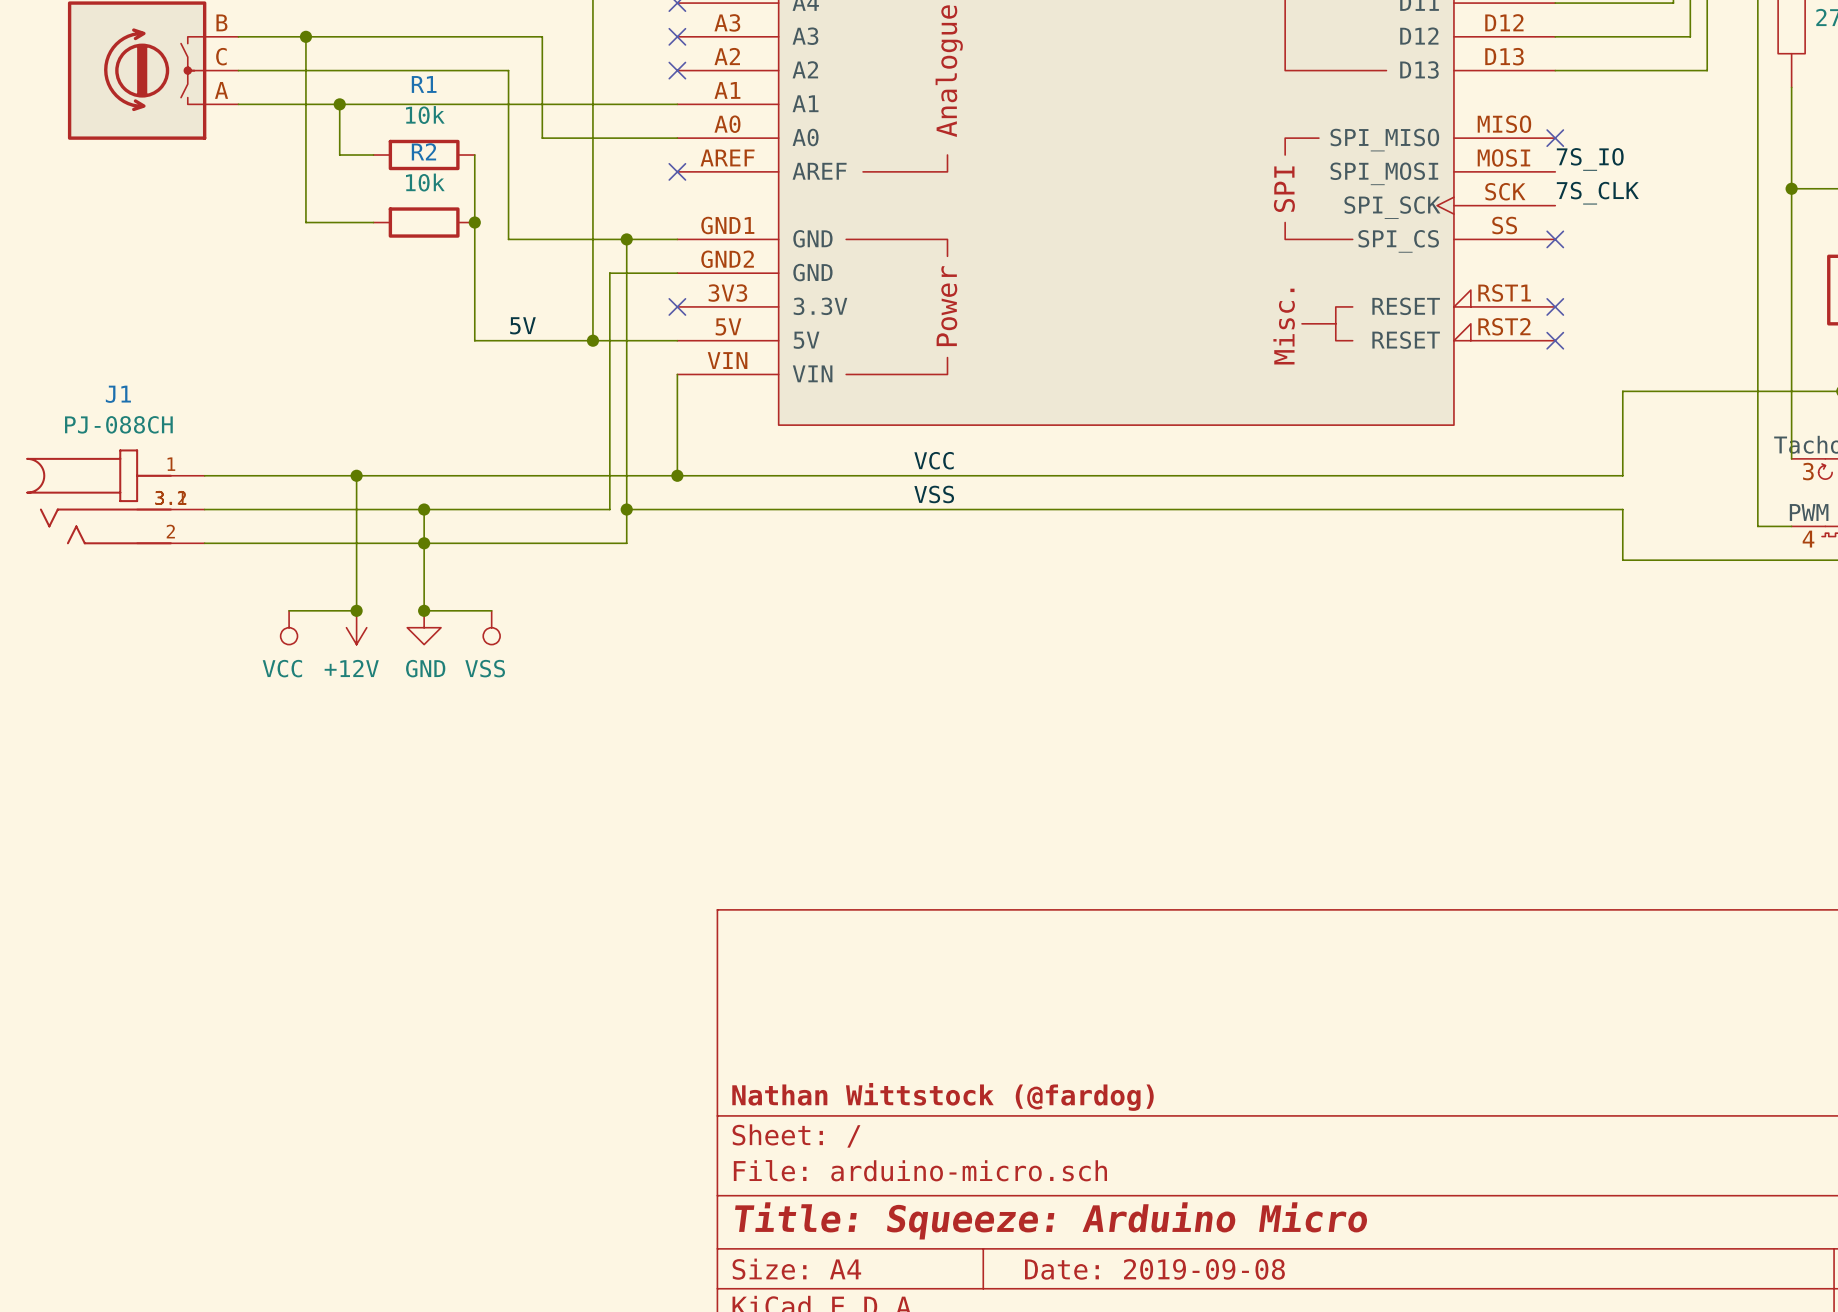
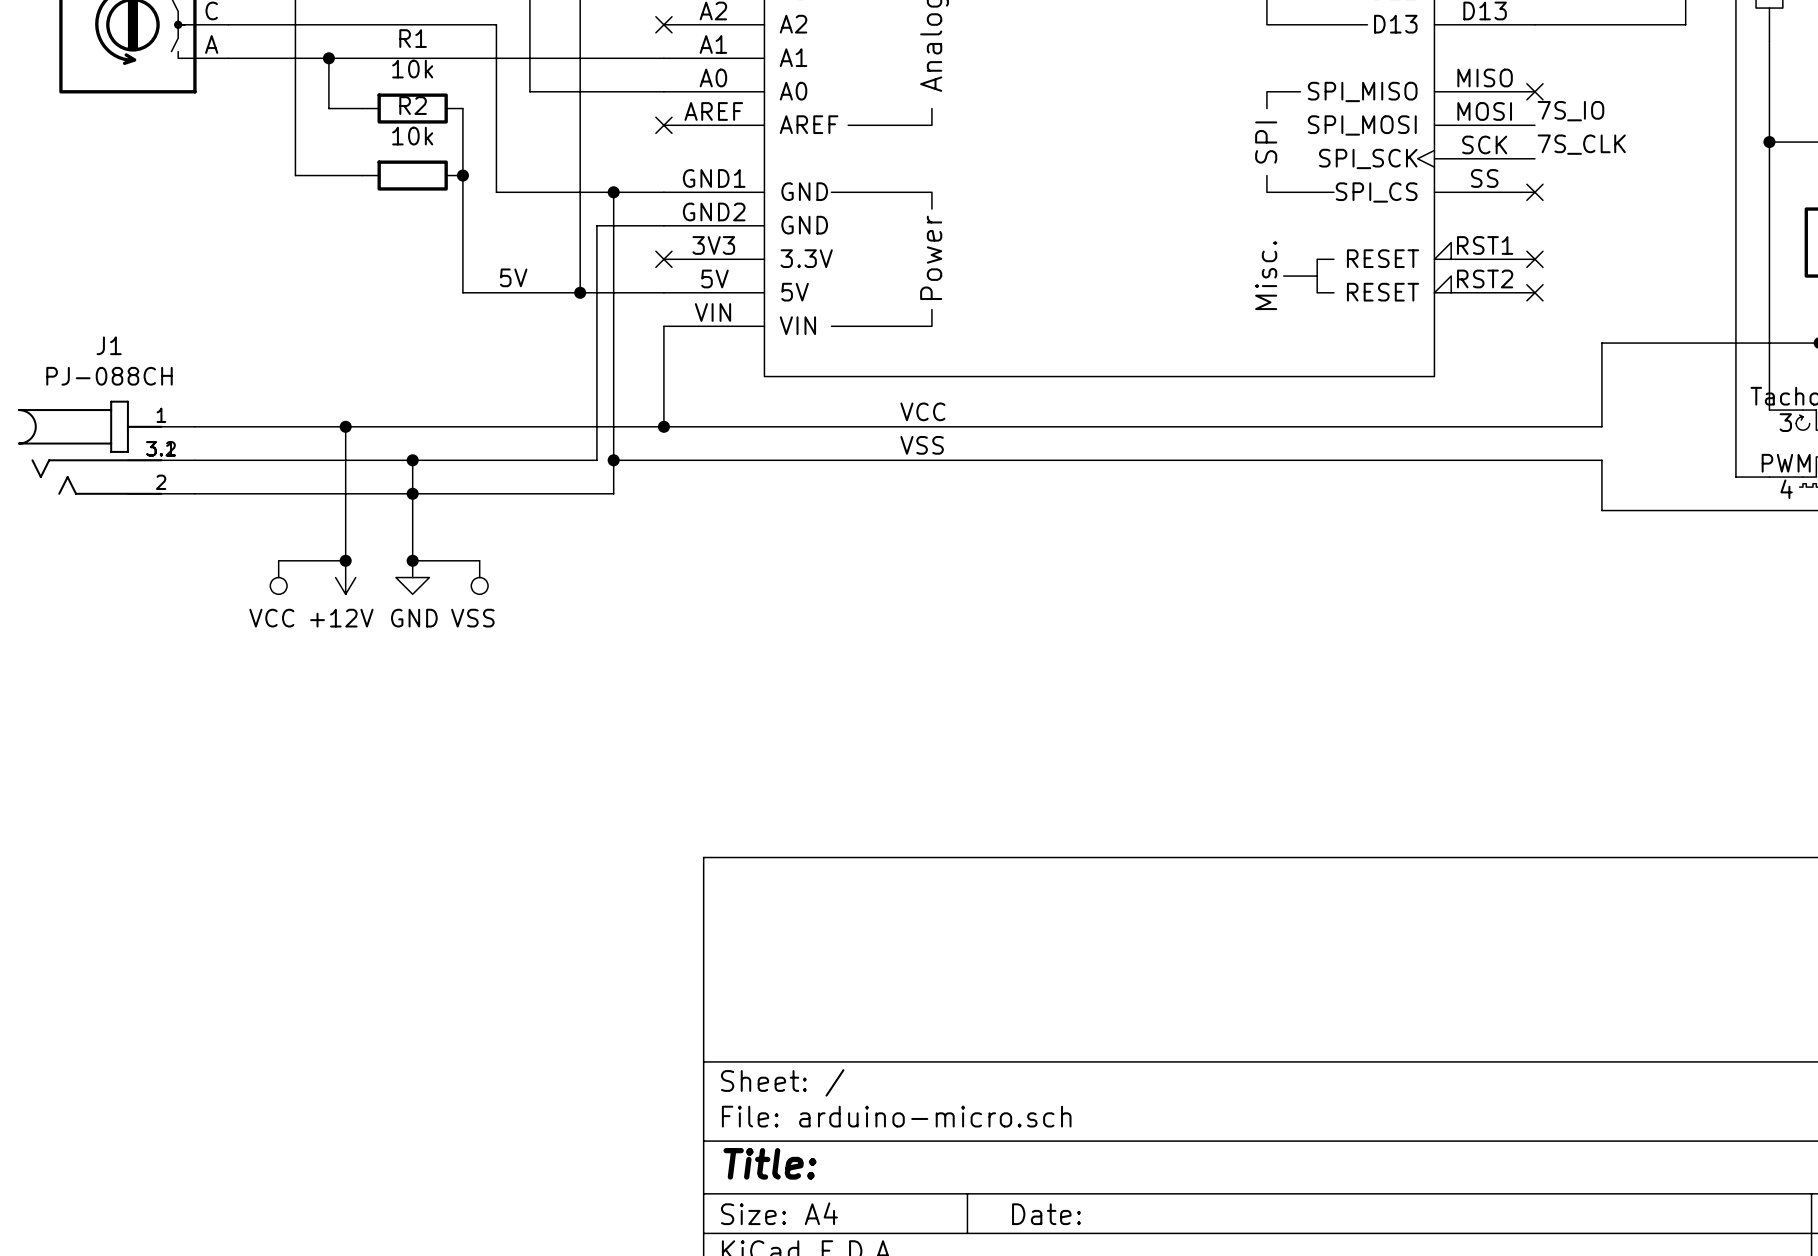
title block: Nathan Wittstock (@fardog) (943, 1096) -> none
title block: Title: Squeeze: Arduino Micro (1051, 1220) -> Title: (770, 1163)
title block: Date: 2019-09-08 (1154, 1269) -> Date: (1046, 1214)

